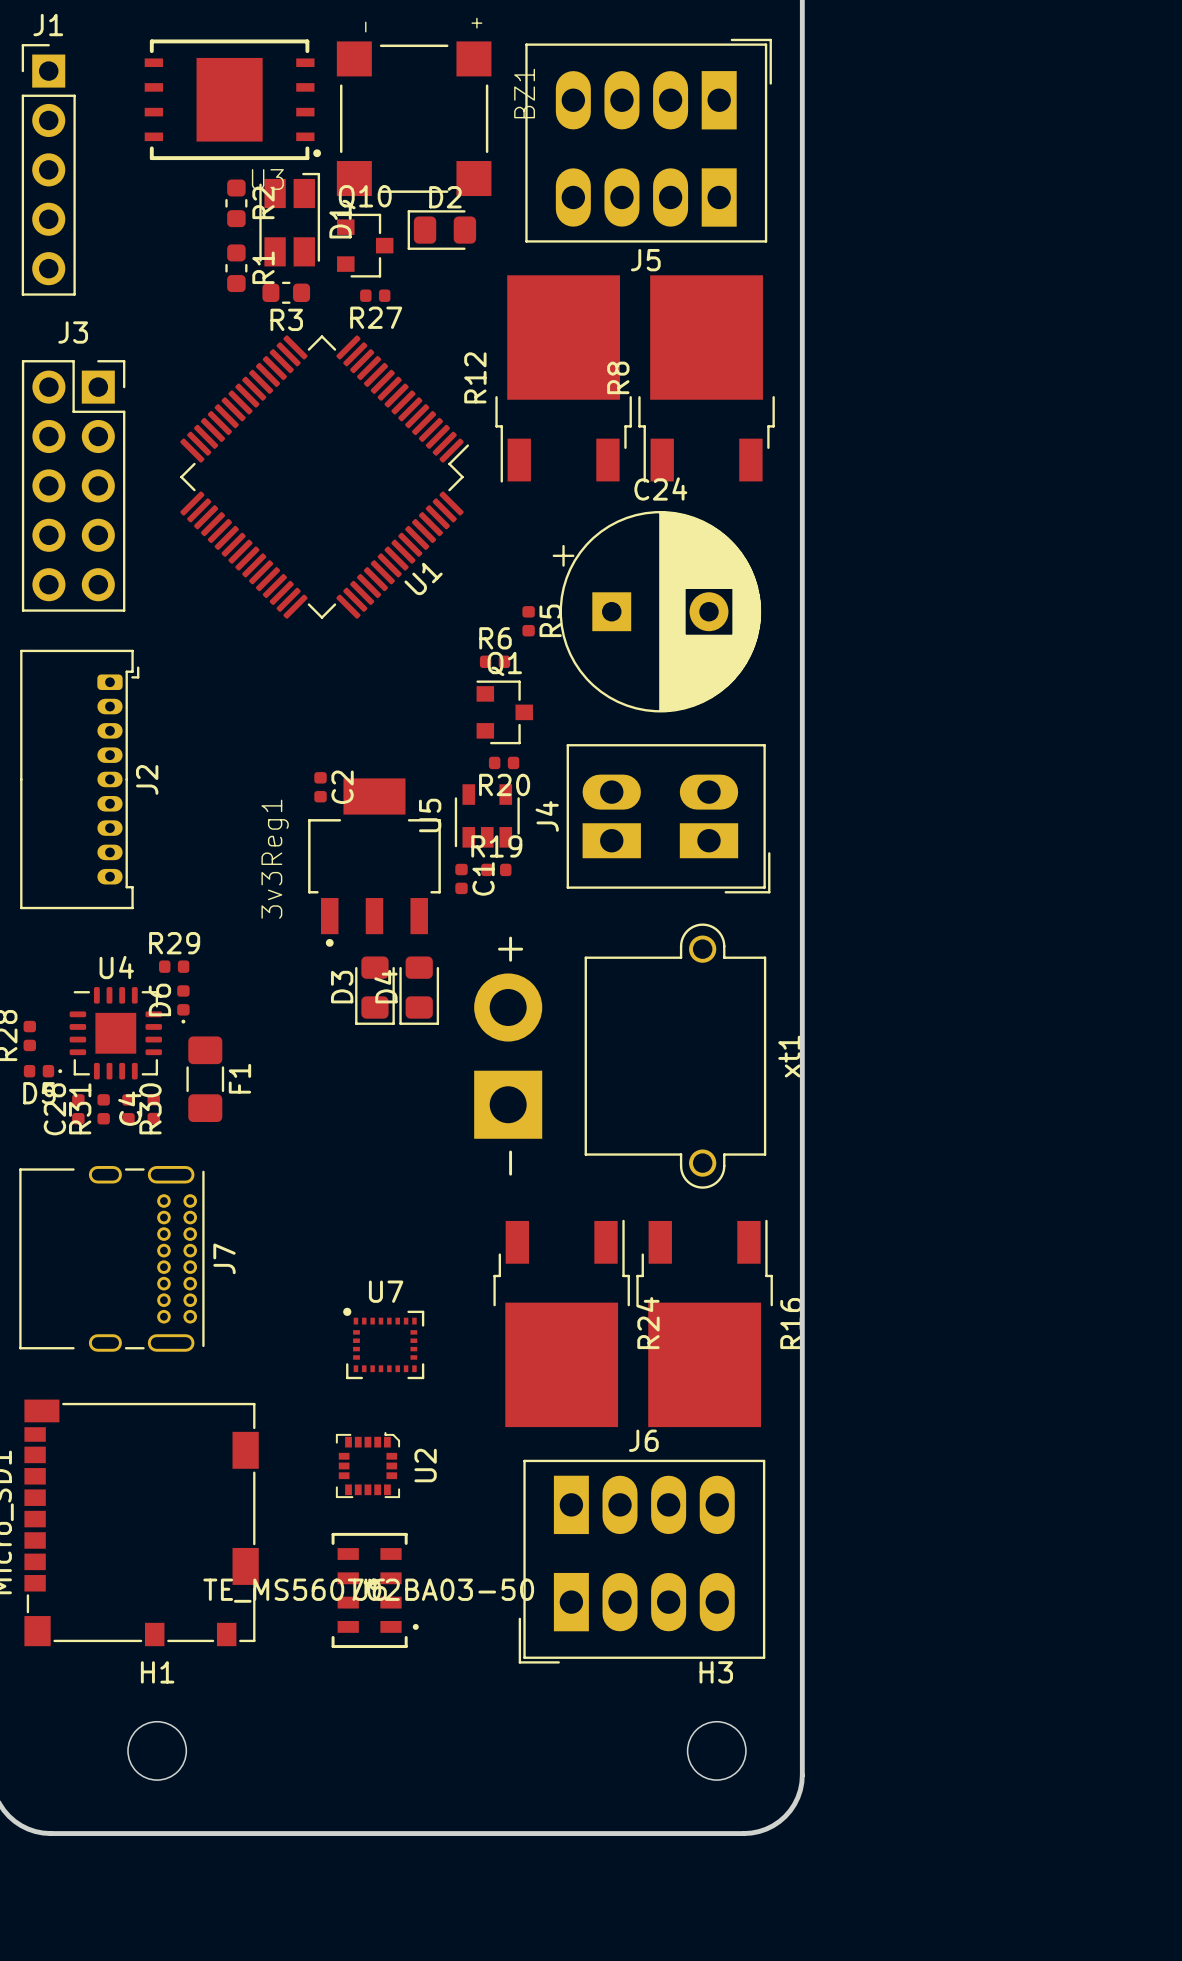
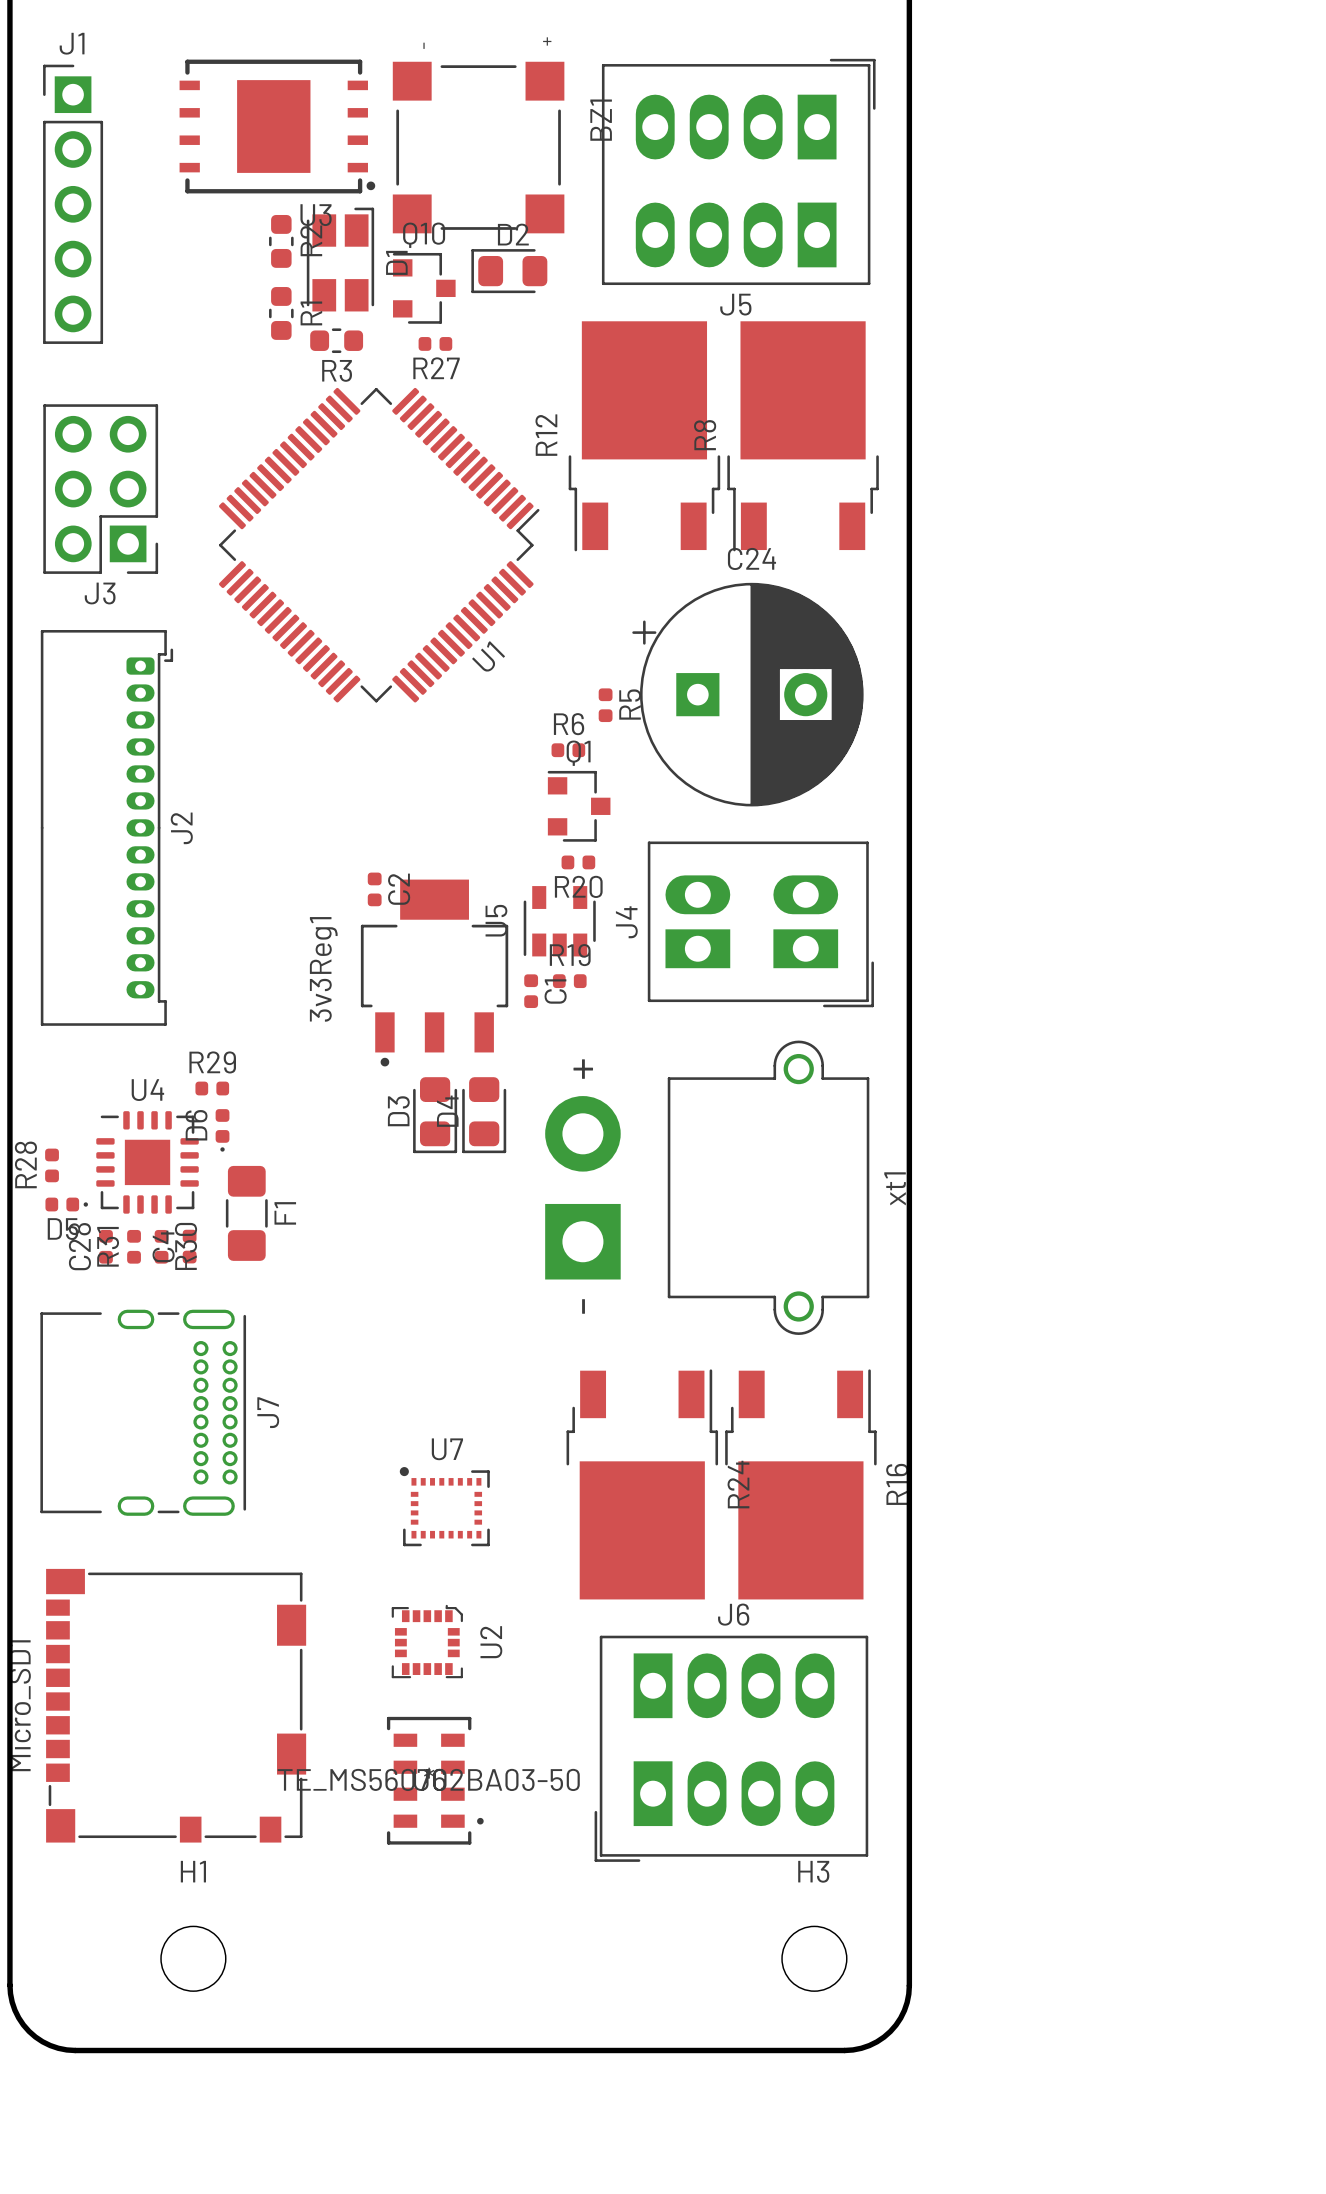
J3 name position: J3 (73, 332) -> J3 (100, 593)
J3 footprint: [21, 360, 126, 612] -> [43, 404, 159, 574]
J2 footprint: [20, 649, 140, 910] -> [40, 630, 174, 1026]

